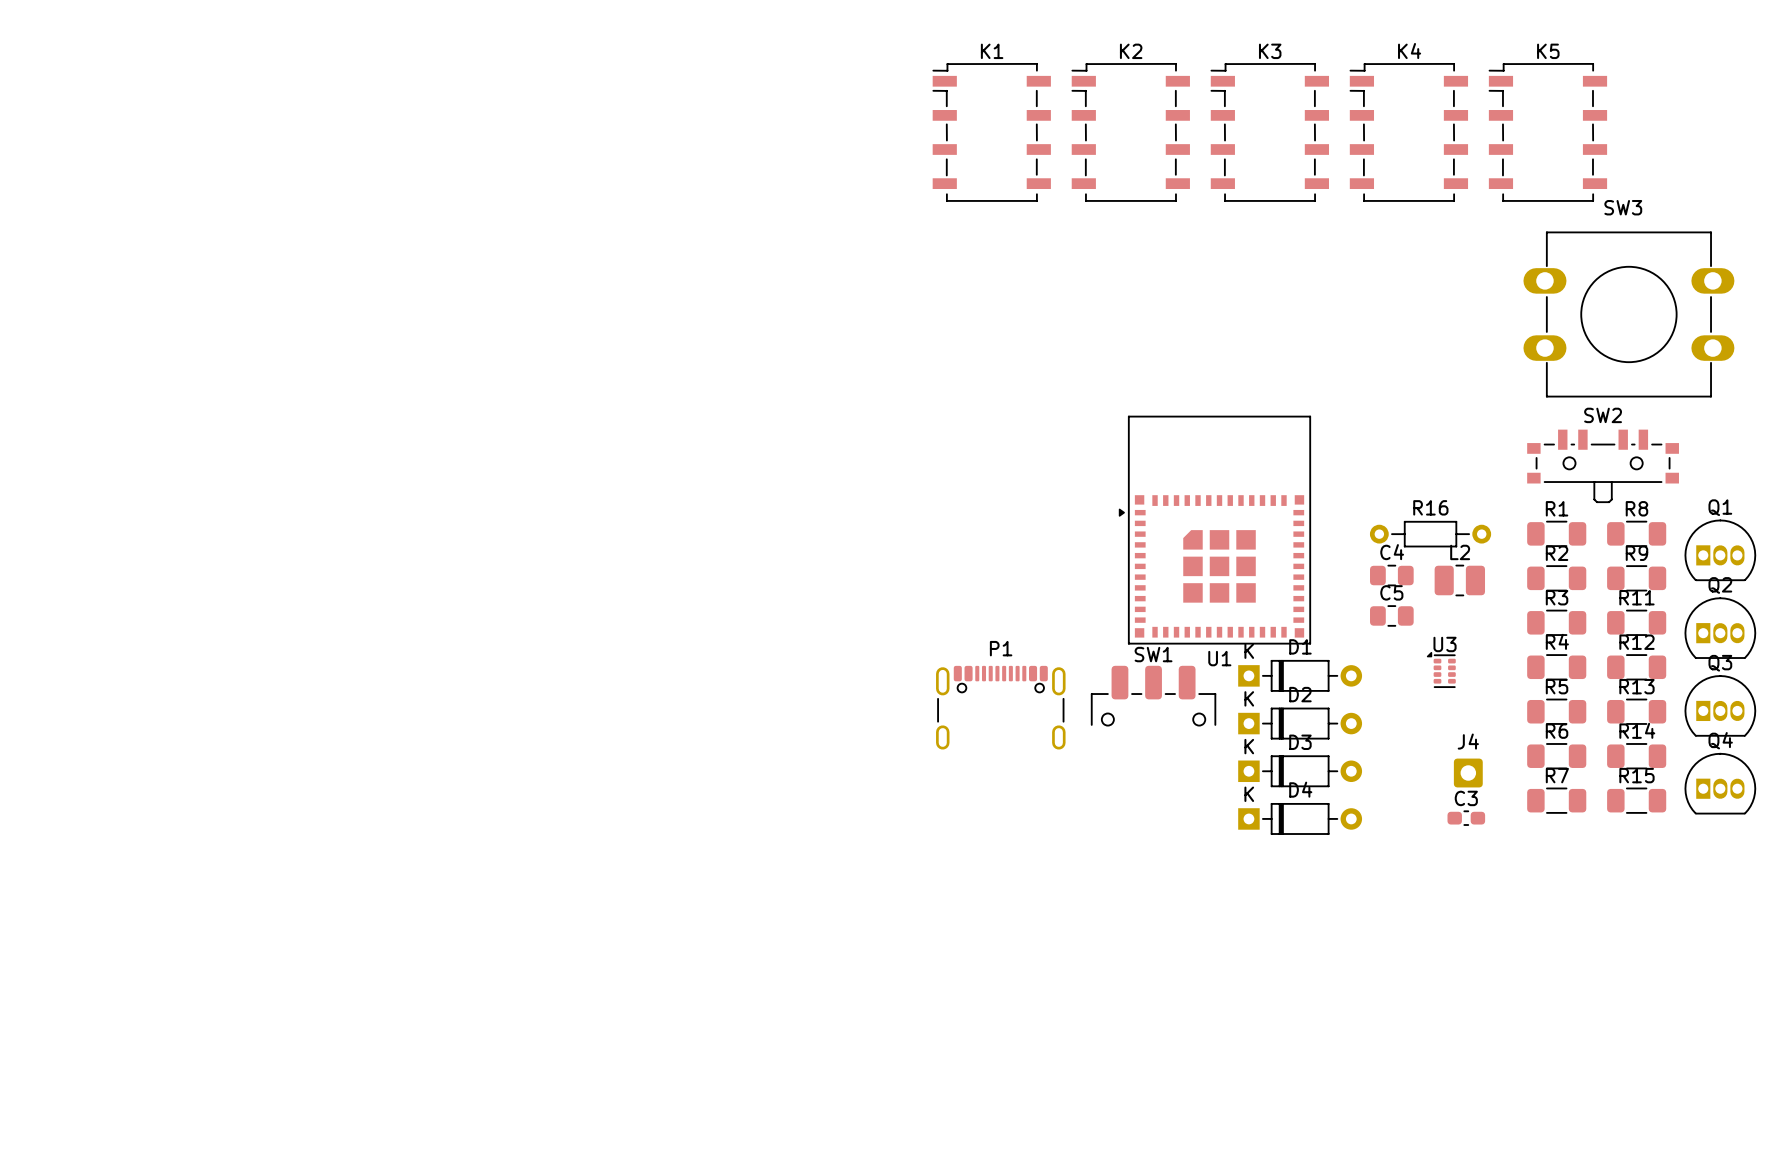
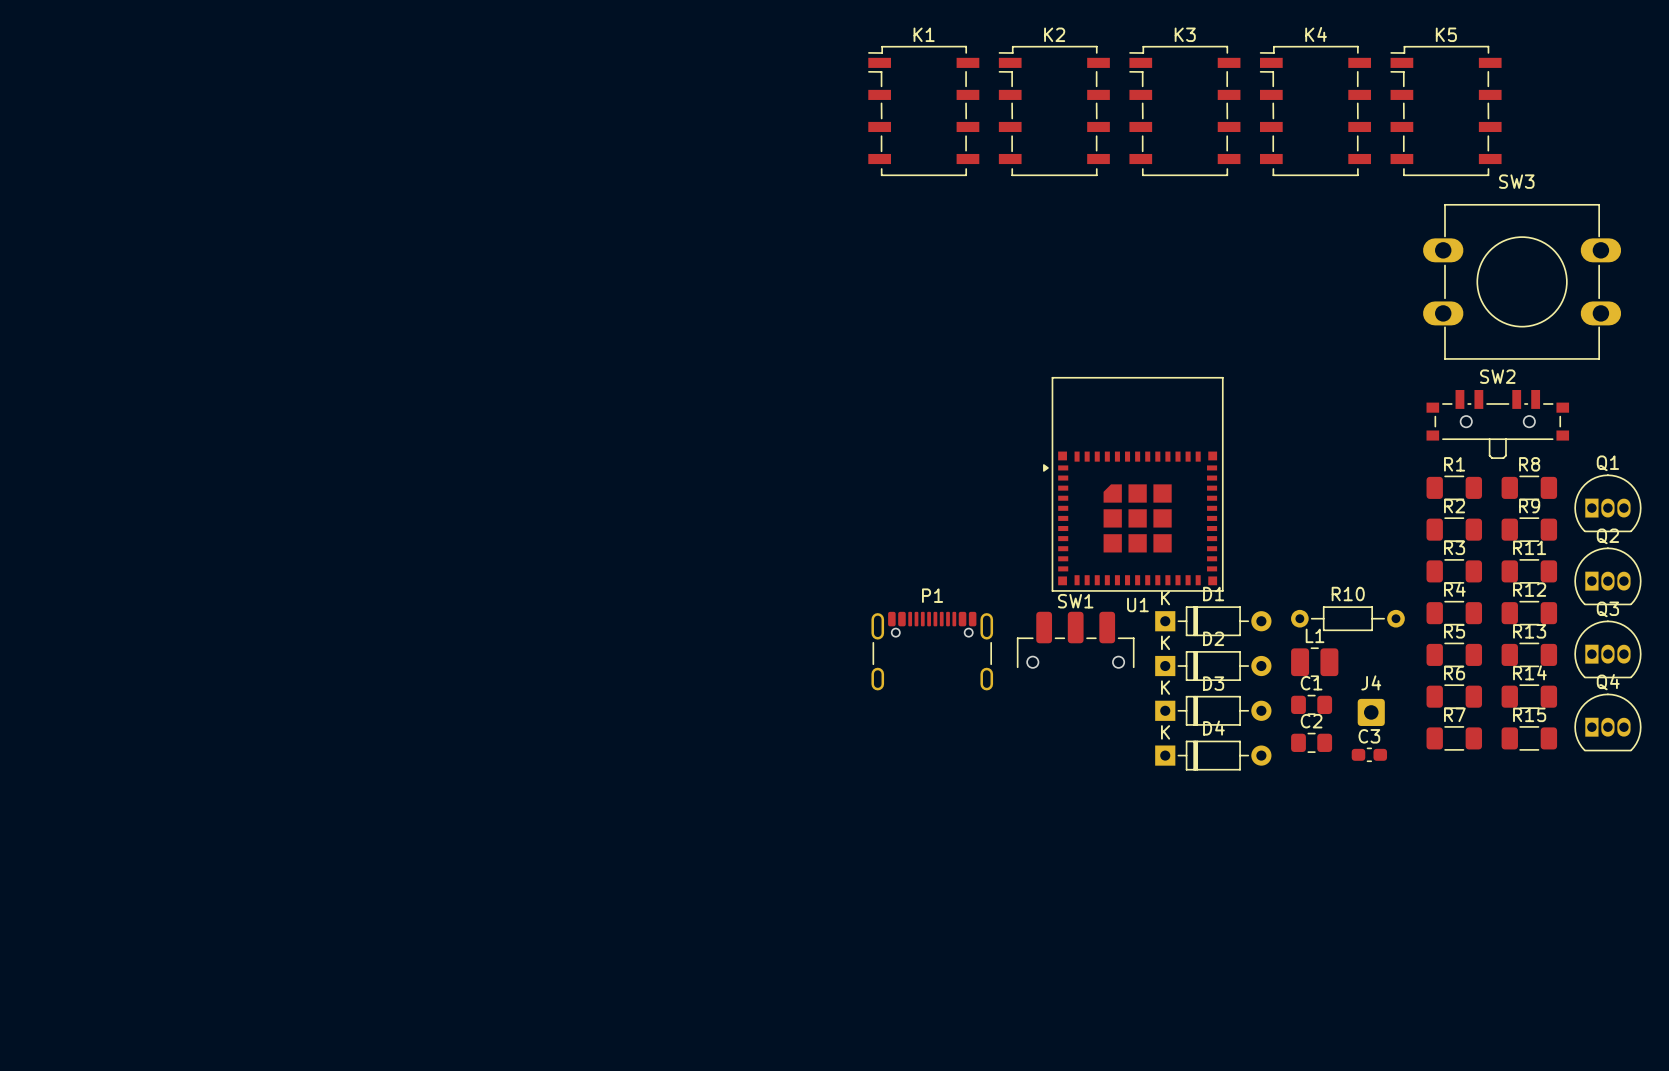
R16: (1430, 534) -> none
C4: (1391, 575) -> none
L2: (1459, 580) -> none
C5: (1391, 615) -> none
U3: (1441, 669) -> none
R10: none -> (1347, 618)
L1: none -> (1314, 662)
C1: none -> (1311, 704)
C2: none -> (1311, 742)

